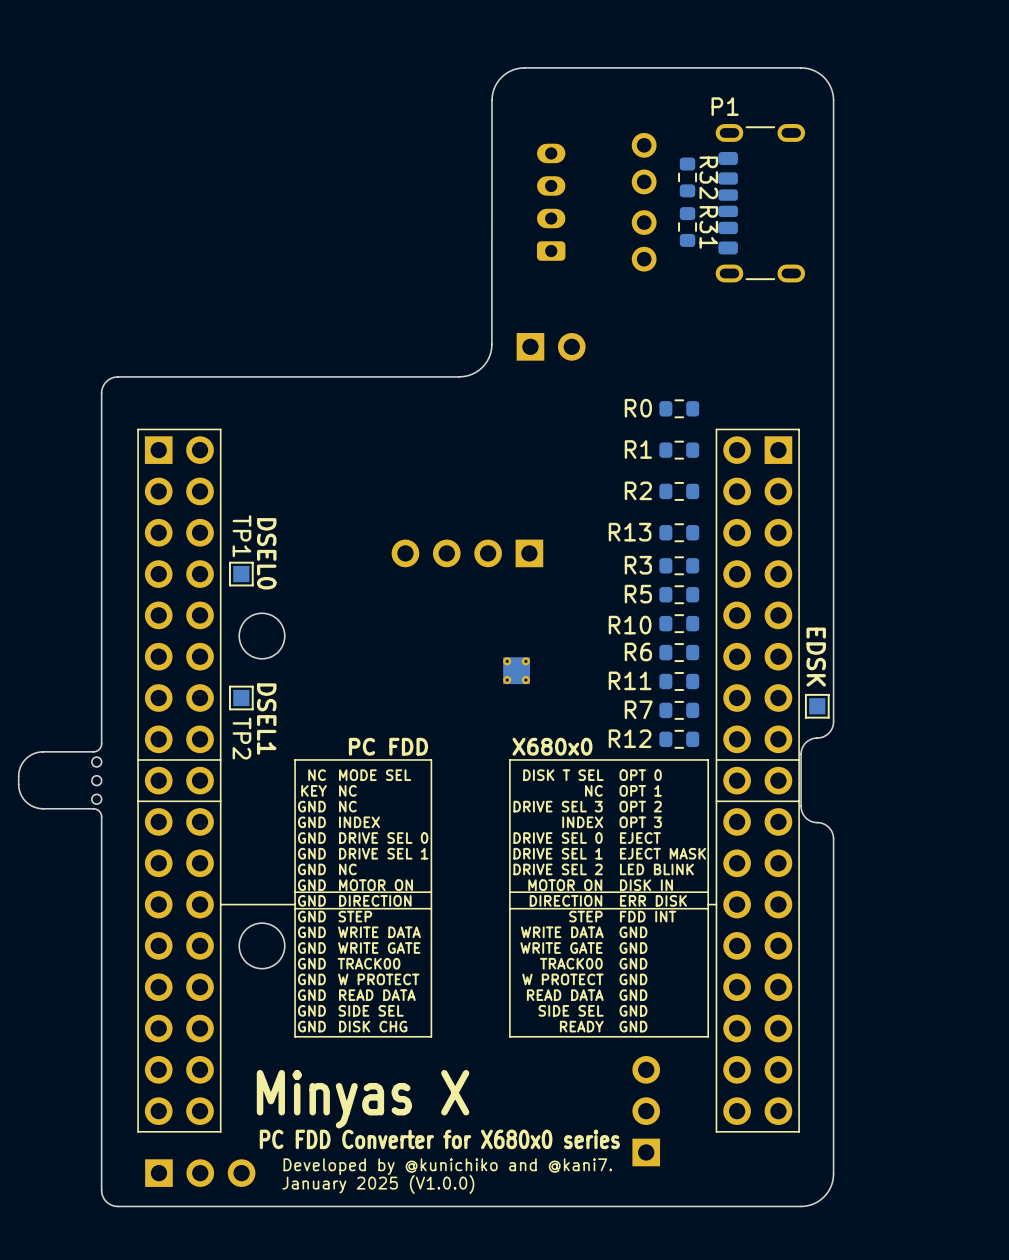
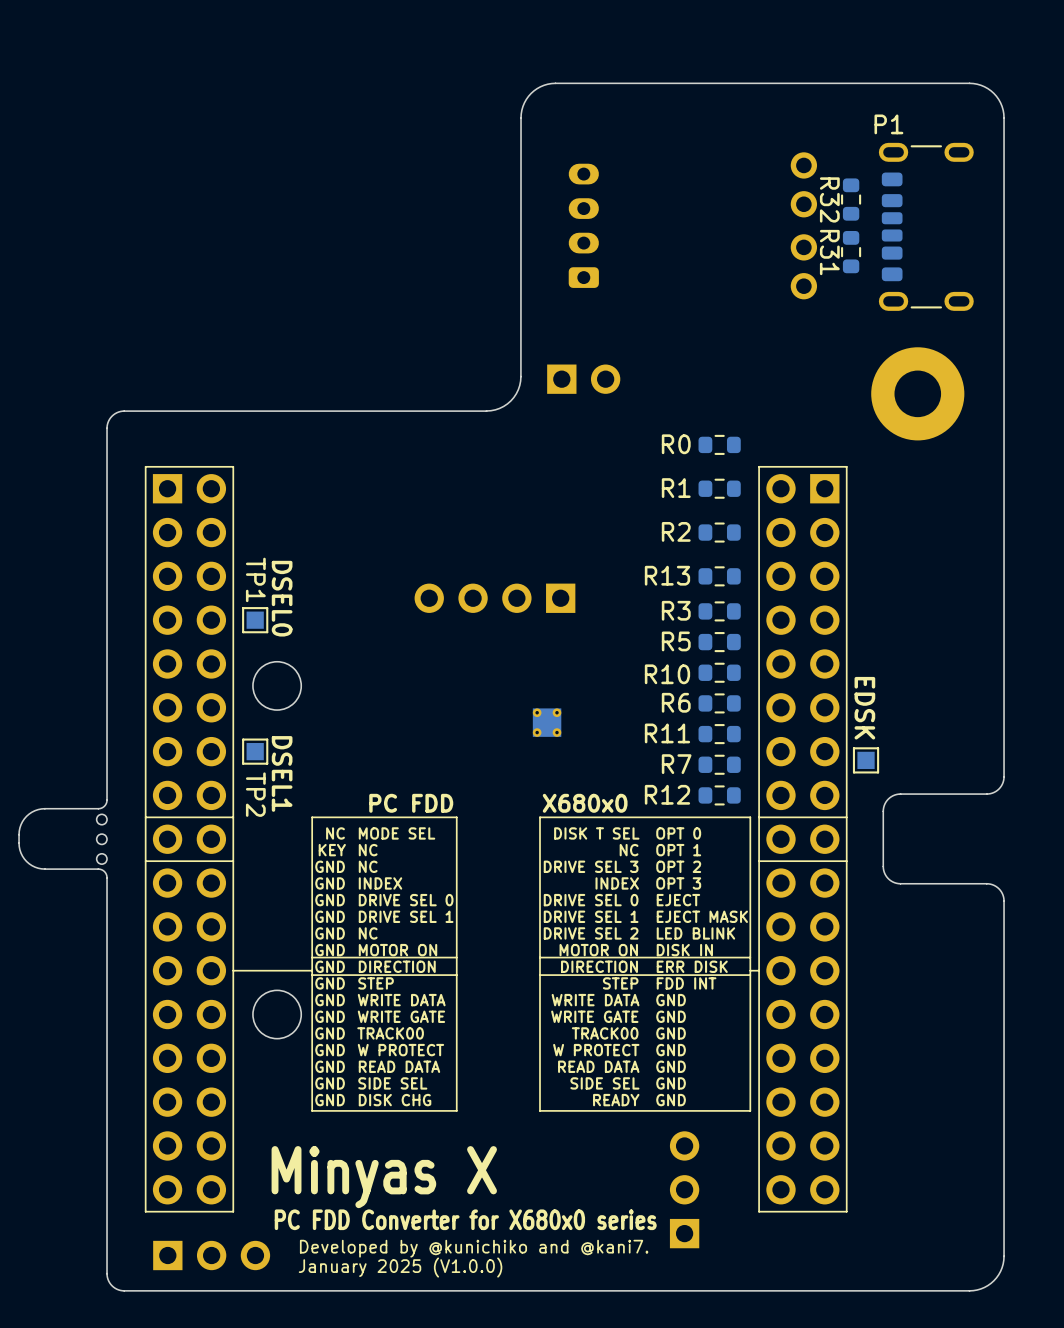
board edge: (801, 67) (811, 69) (824, 77) (830, 86) (833, 100) (833, 721) (831, 728) (827, 734) (805, 742) (801, 754) (801, 811) (808, 820) (827, 826) (833, 837) (833, 1173) (831, 1184) (824, 1196) (811, 1204) (801, 1206) -> (848, 83) (977, 84) (987, 88) (996, 96) (1002, 106) (1004, 117) (1003, 780) (997, 790) (988, 793) (896, 794) (887, 800) (883, 811) (883, 868) (889, 879) (900, 883) (988, 883) (998, 888) (1003, 897) (1003, 1260) (996, 1277) (987, 1285) (977, 1290) (848, 1290)
R32 position: (687, 177) -> (851, 199)
R32 name position: R32 (708, 177) -> R32 (829, 199)
part position: (644, 202) -> (803, 225)
P1 position: (760, 203) -> (926, 226)
R31 position: (687, 227) -> (851, 252)
R31 name position: R31 (708, 227) -> R31 (829, 252)
part: none -> (917, 393)

